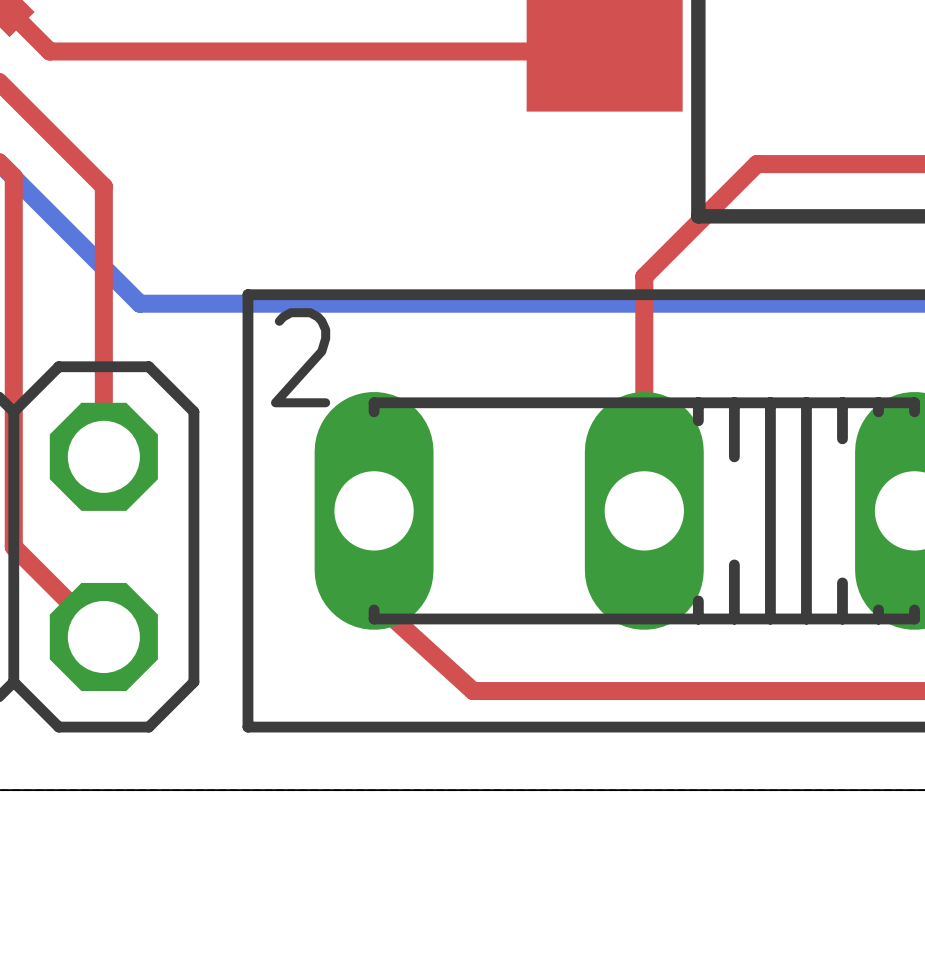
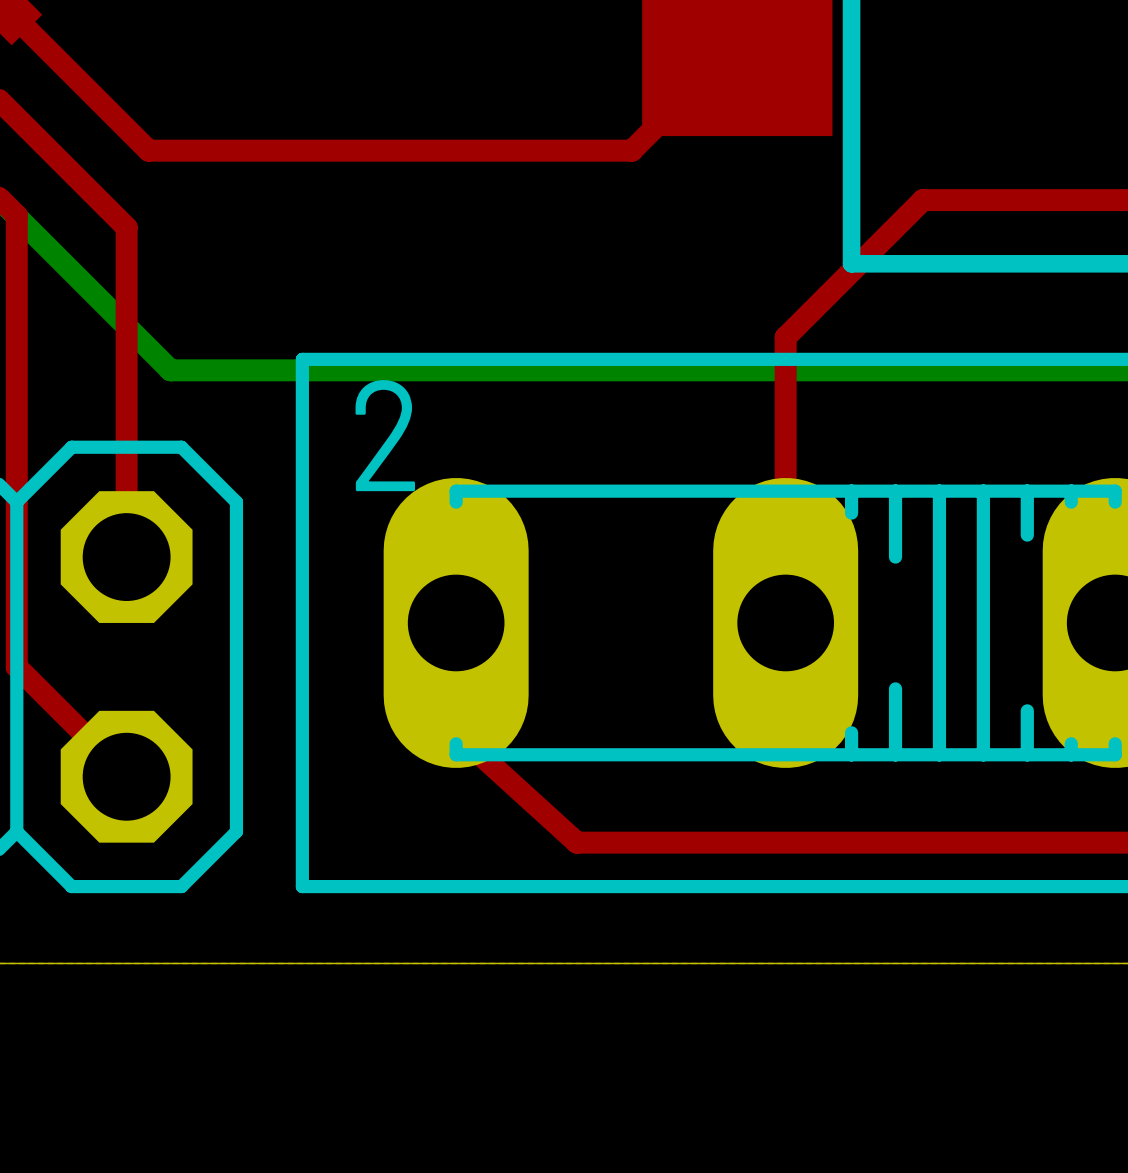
top track: (572, 16) (563, 25) (563, 60) (554, 51) (49, 51) -> (697, 19) (697, 84) (631, 150) (148, 150) (60, 62)

